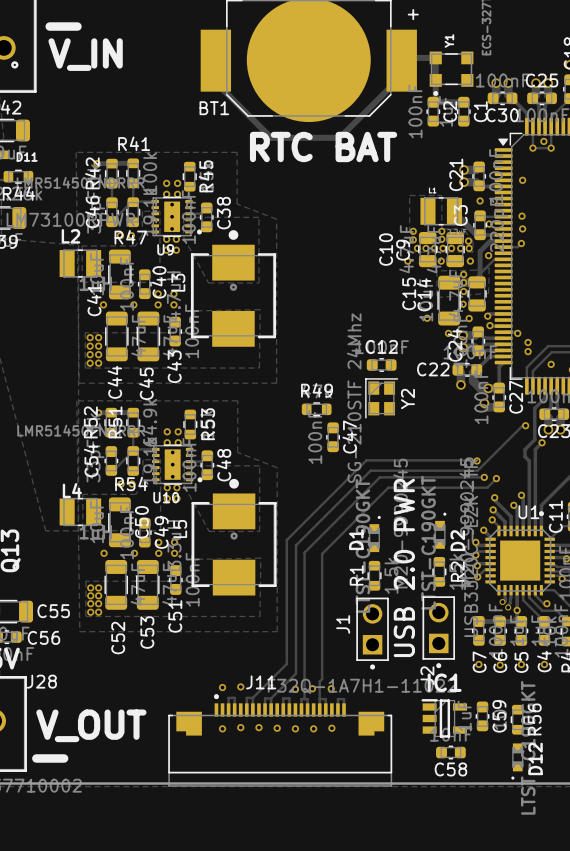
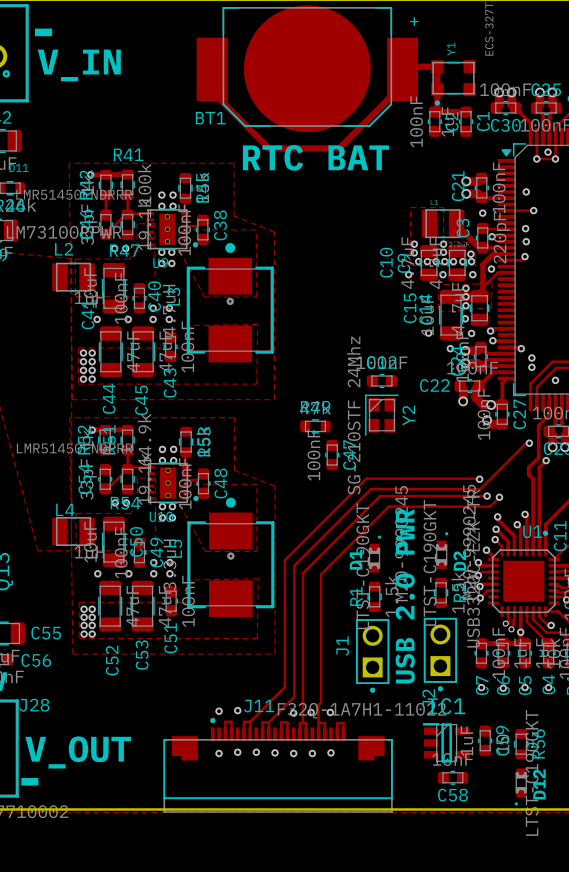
track: none -> (506, 210) (533, 210)
via: none -> (533, 210)

